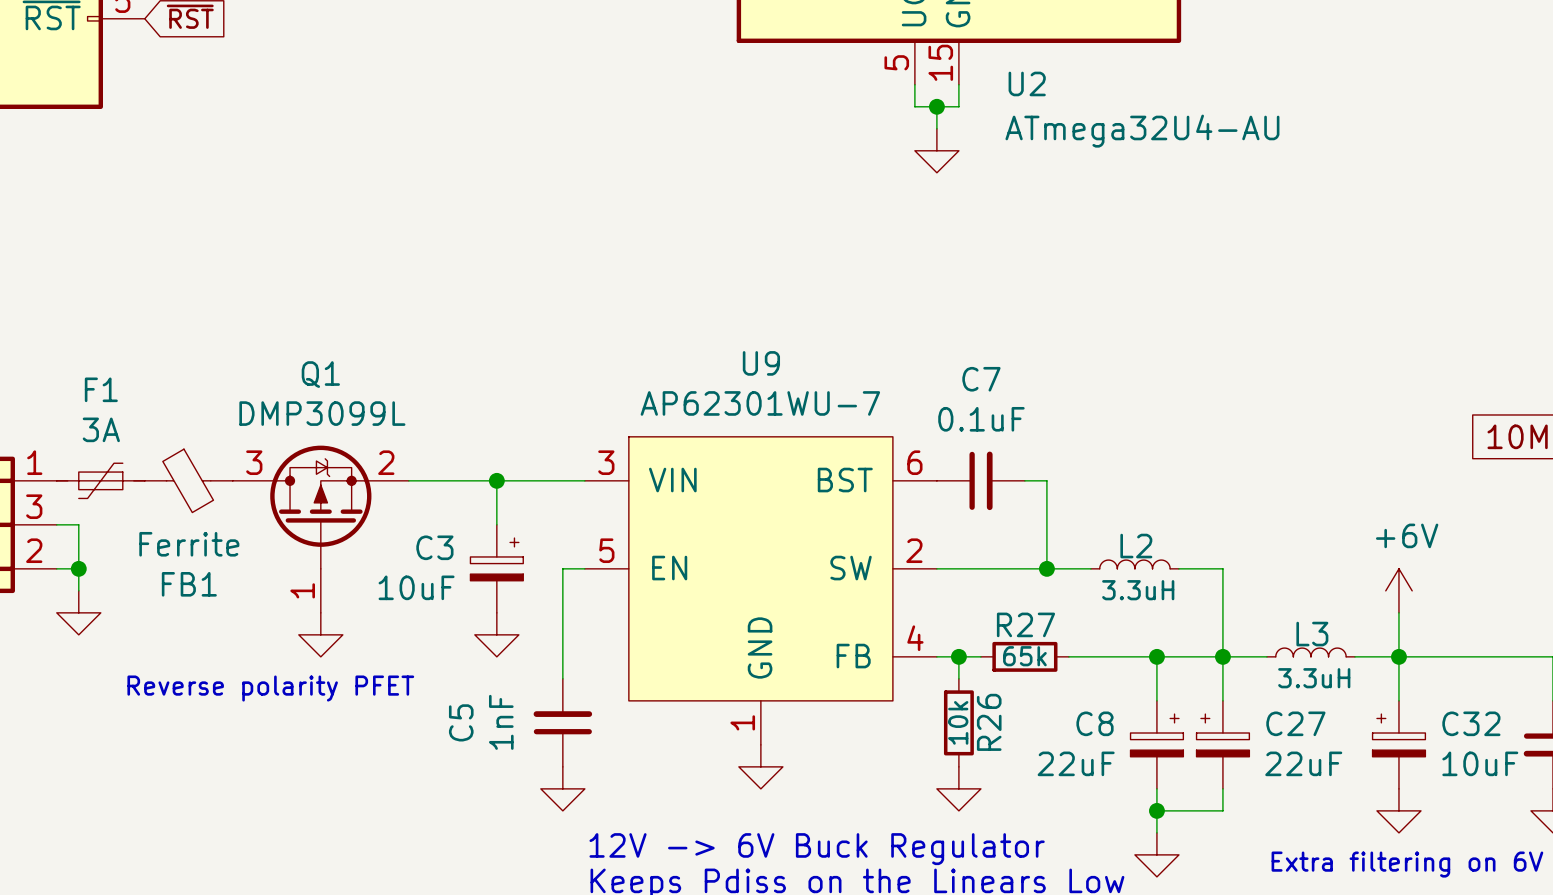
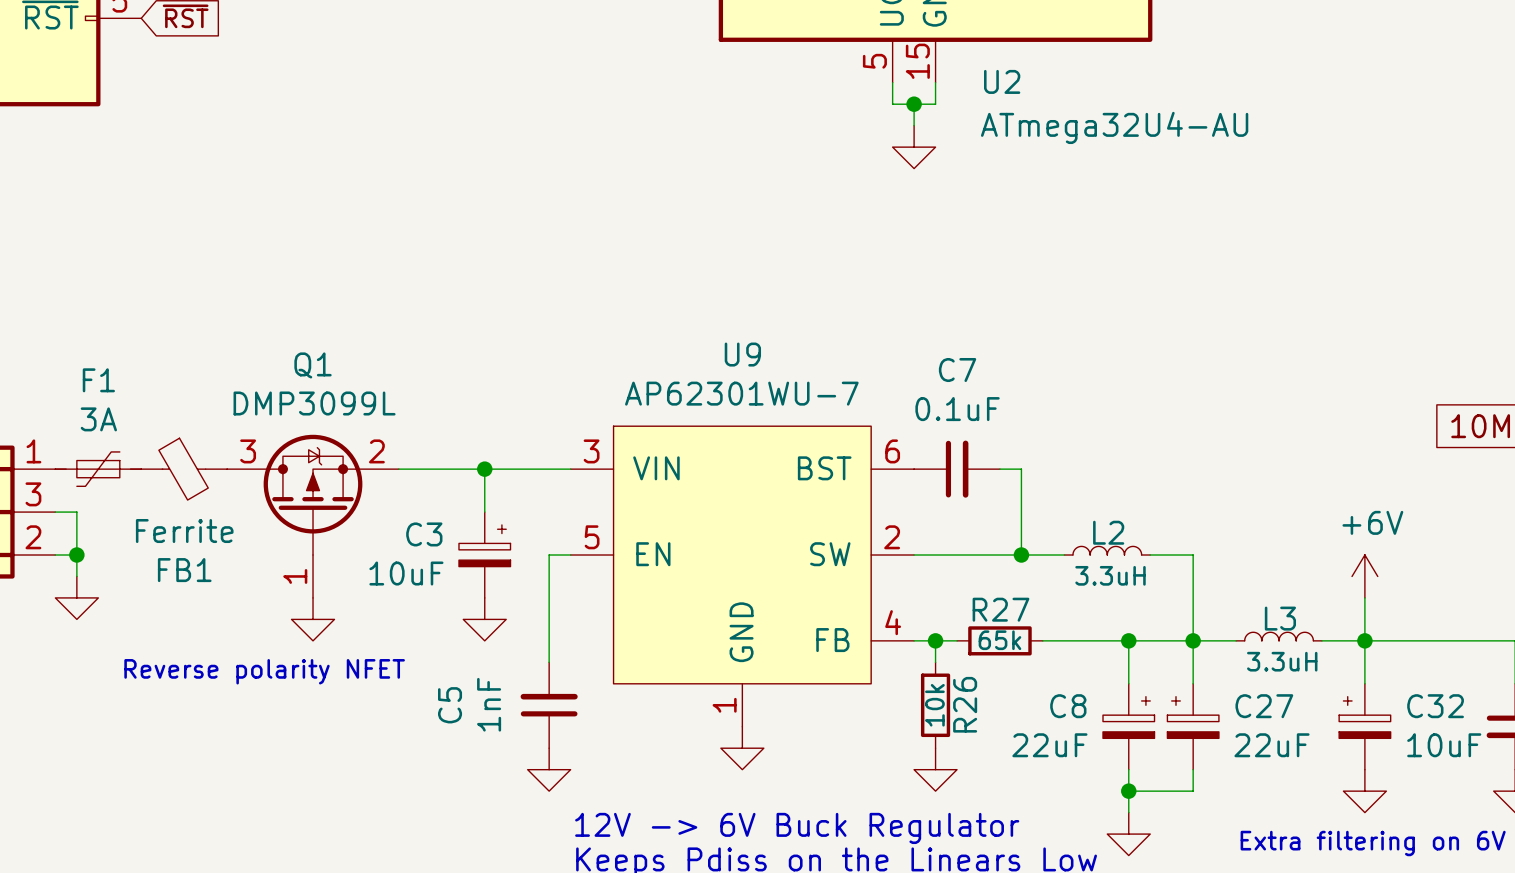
text: Reverse polarity PFET (270, 688) -> Reverse polarity NFET (264, 671)

